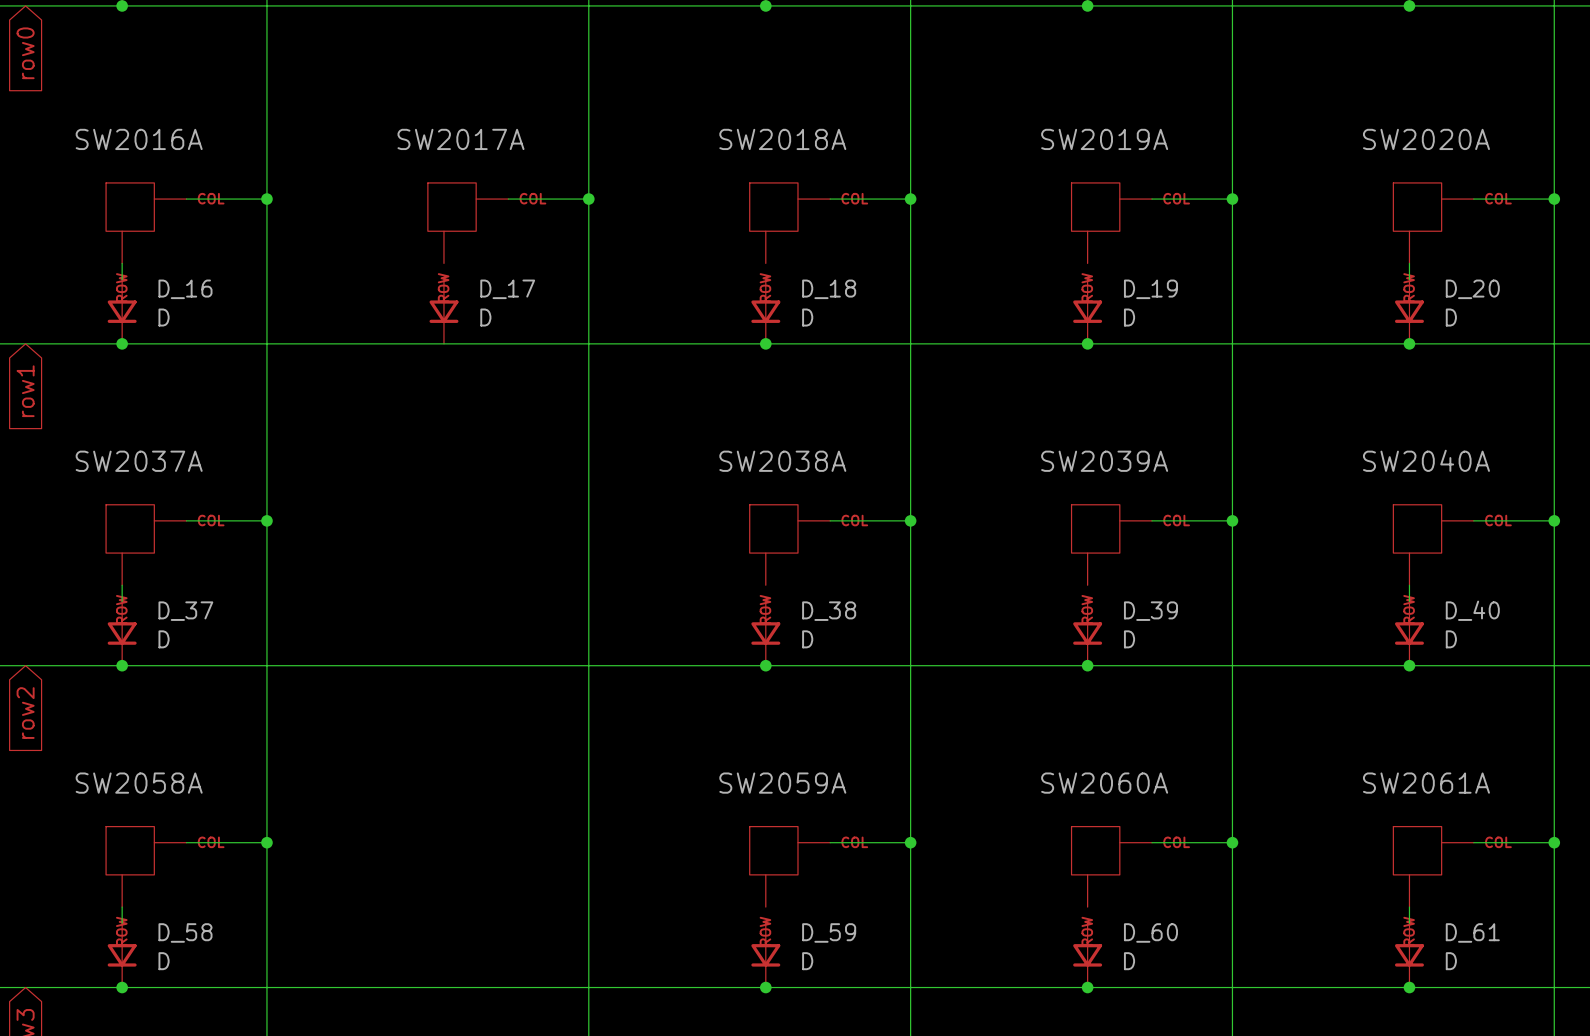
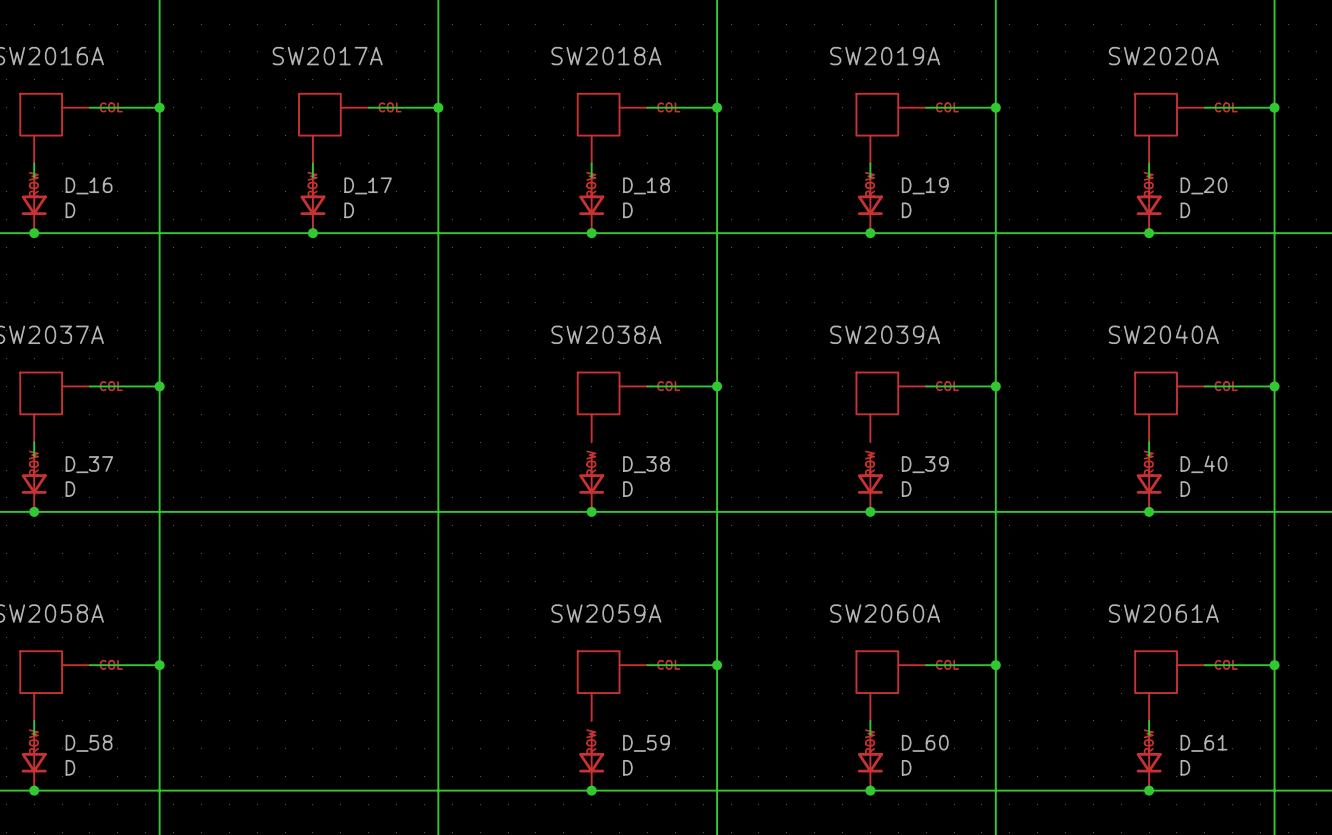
wire: none -> (312, 163) (312, 177)
wire: none -> (591, 163) (591, 177)
wire: none -> (870, 163) (870, 177)
junction: none -> (312, 233)
wire: none -> (870, 720) (870, 734)

